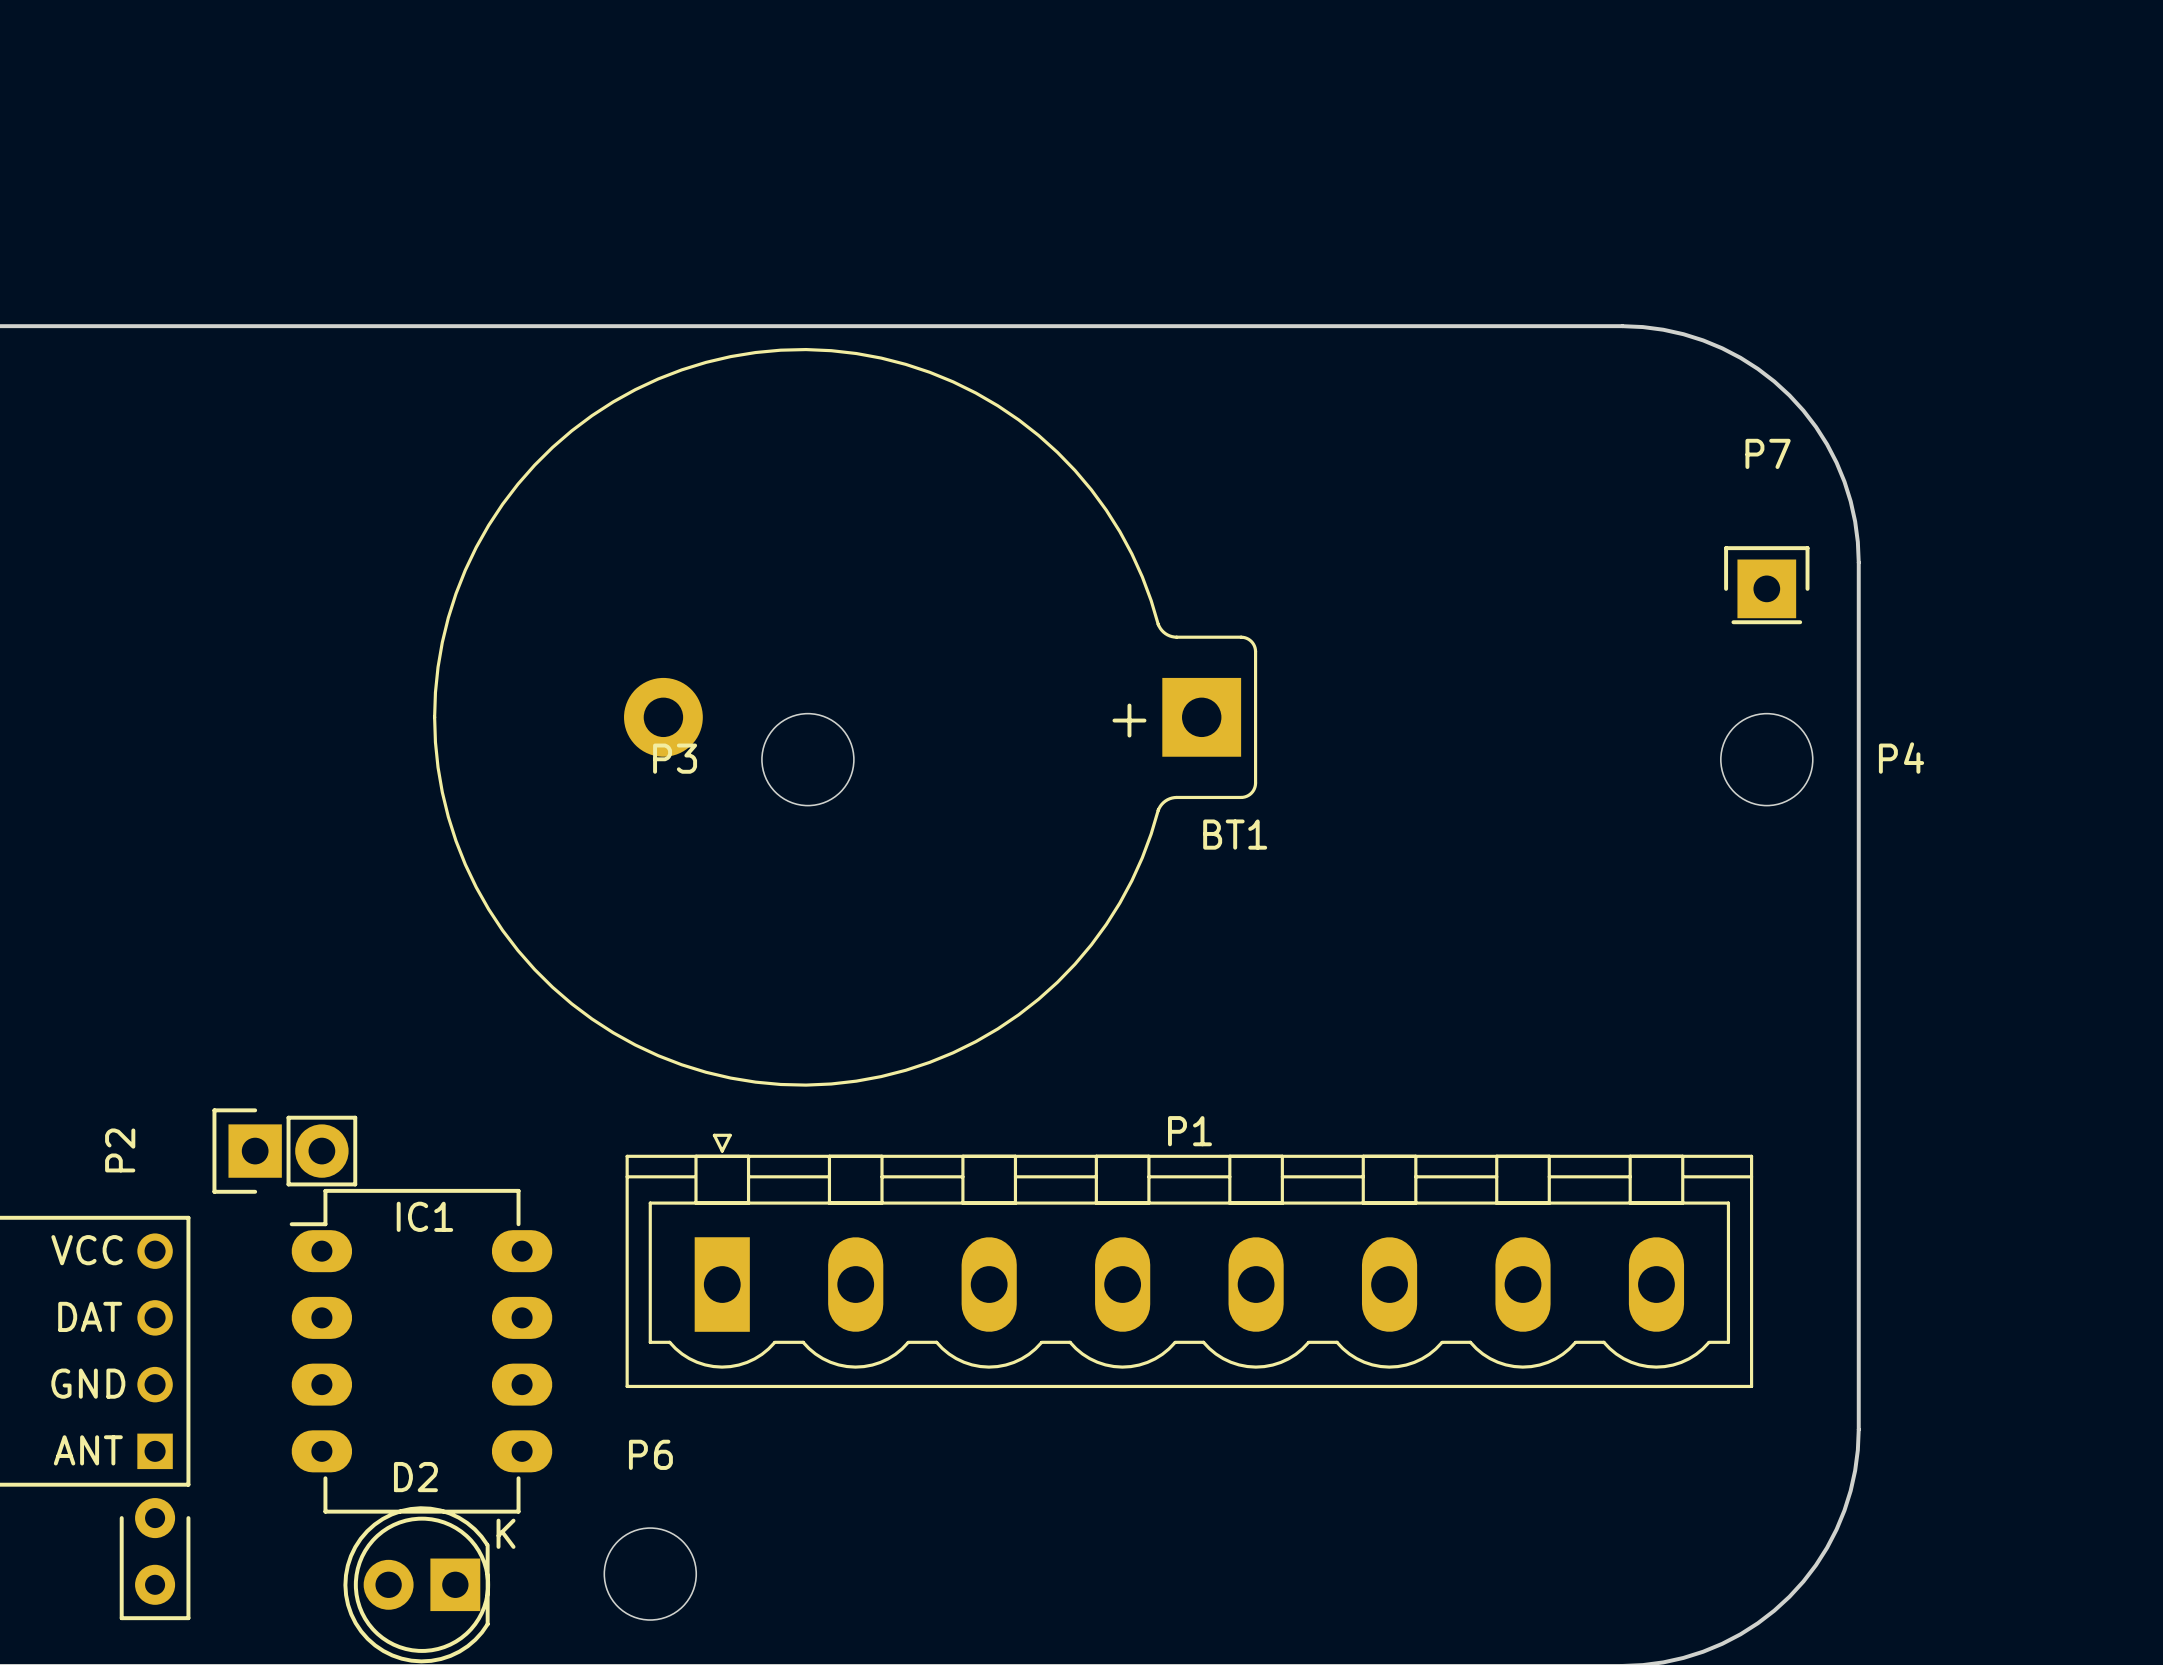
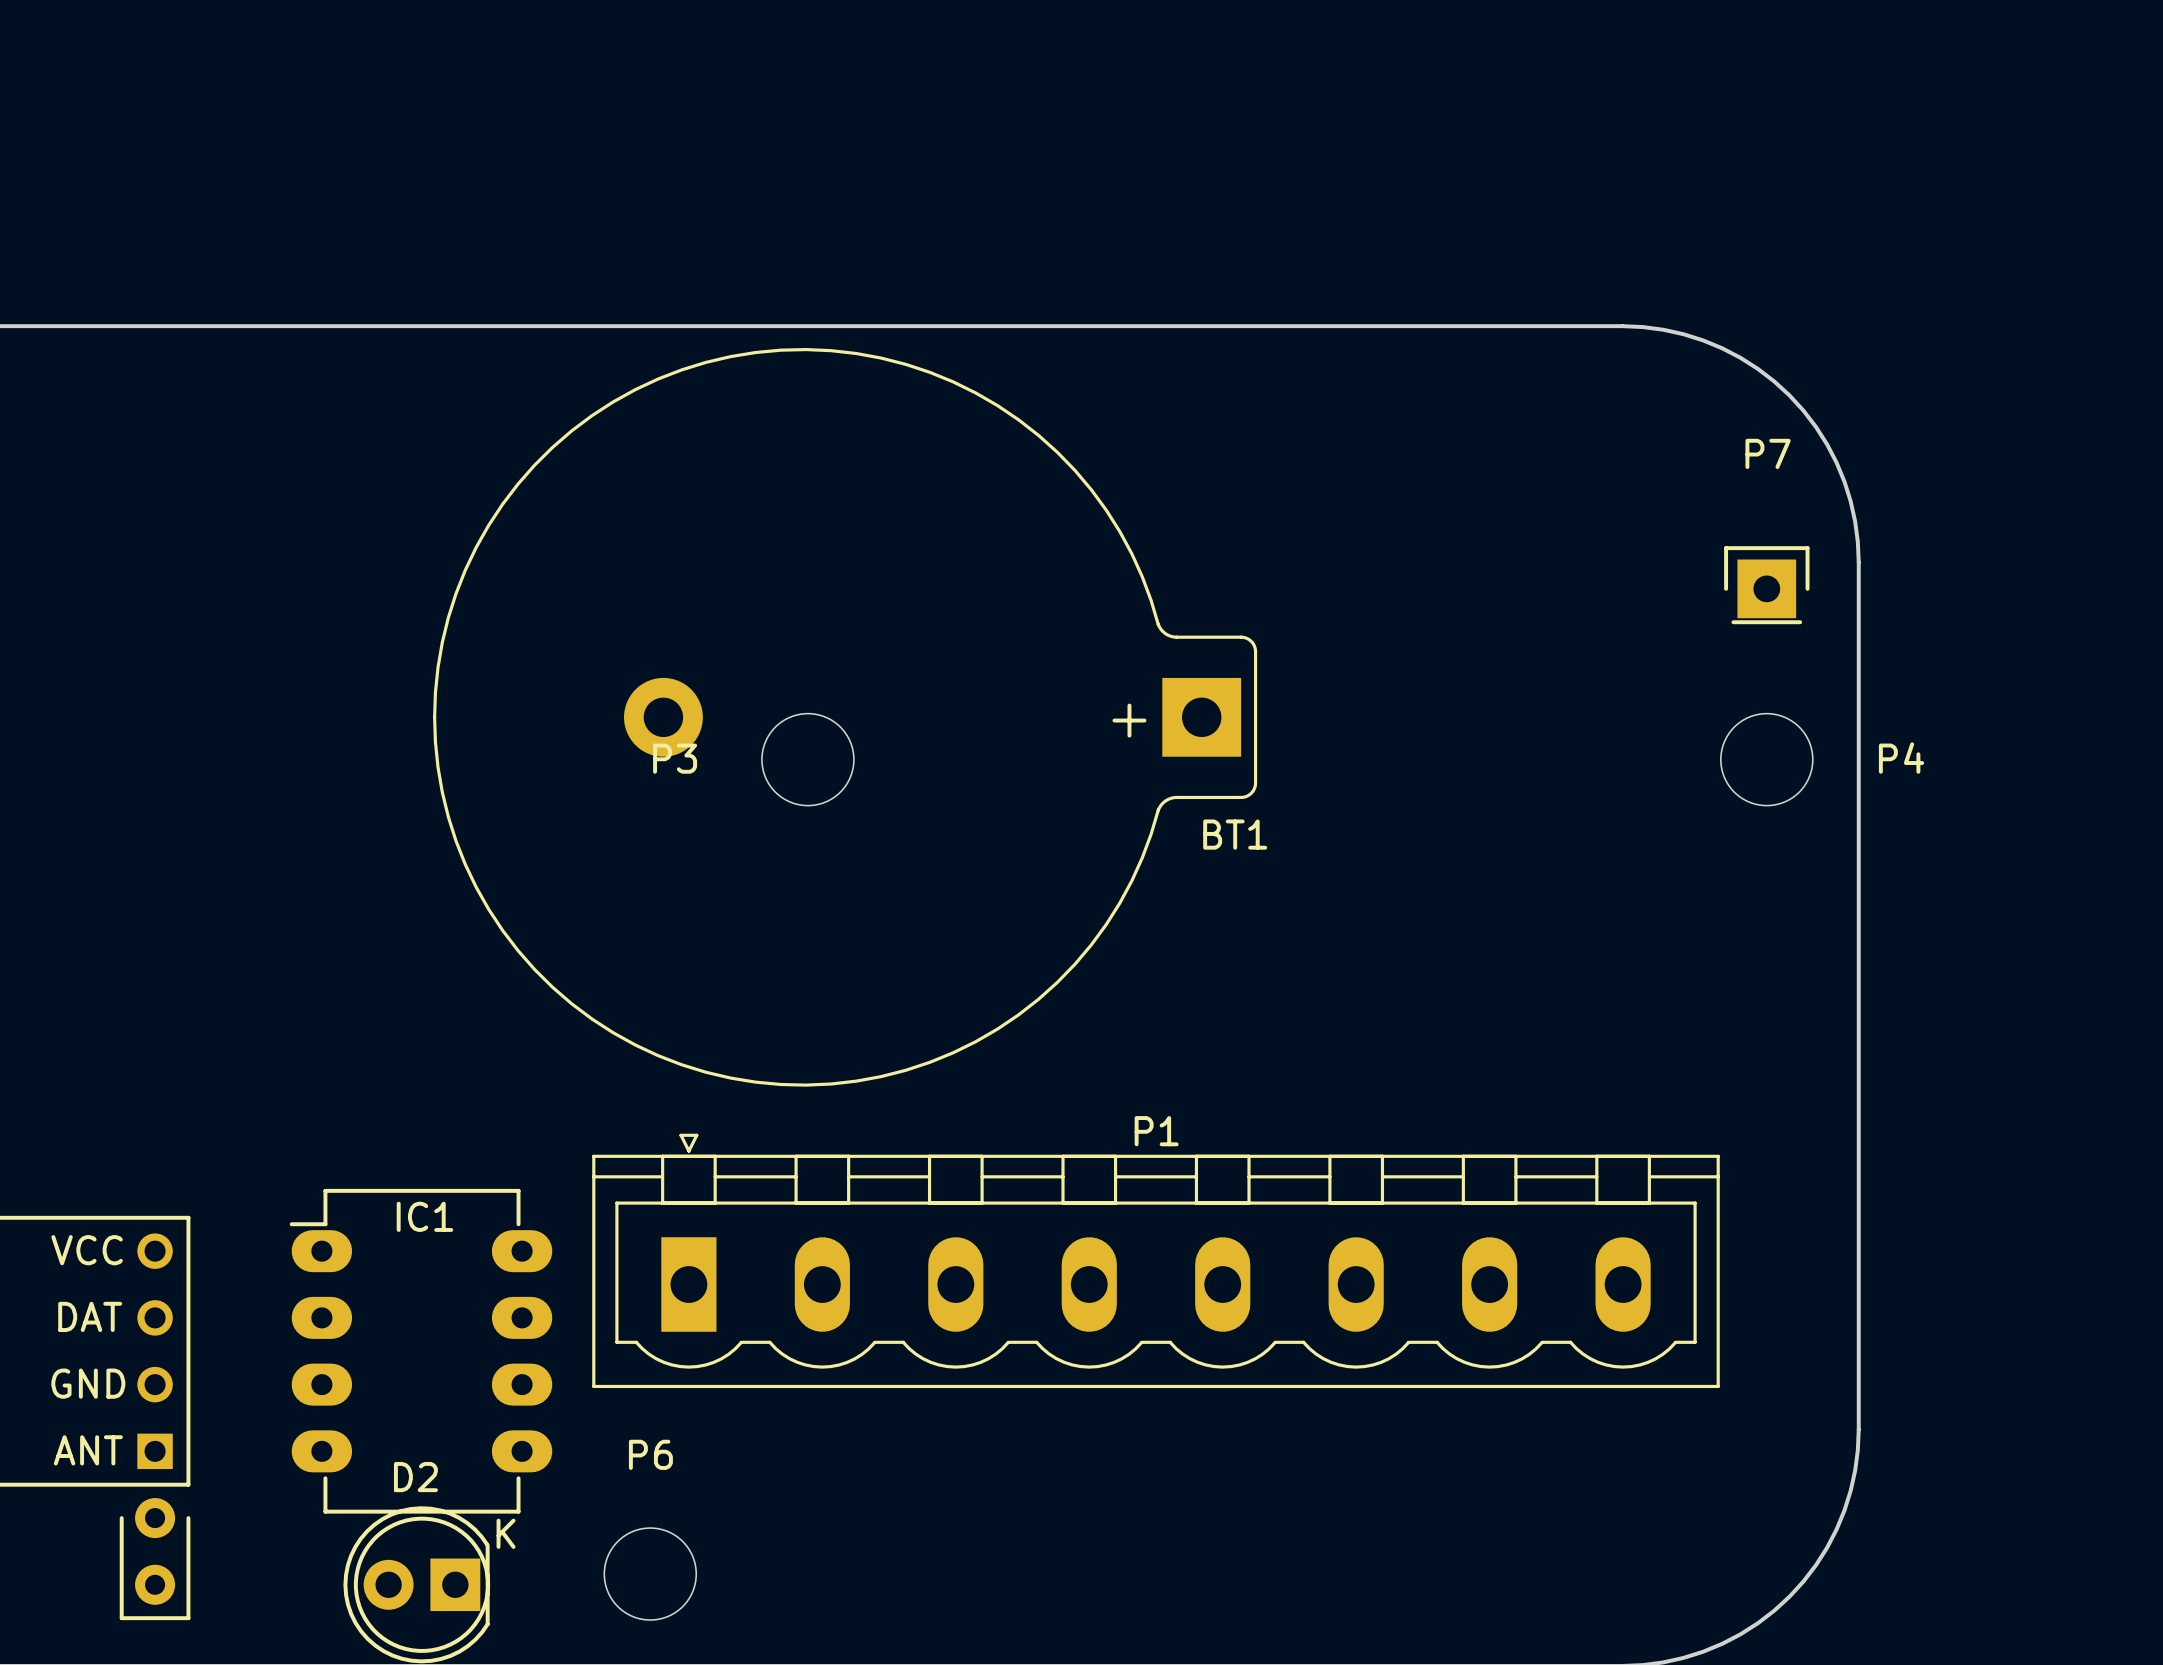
P2: (284, 1151) -> none
P1 position: (1189, 1260) -> (1156, 1260)

